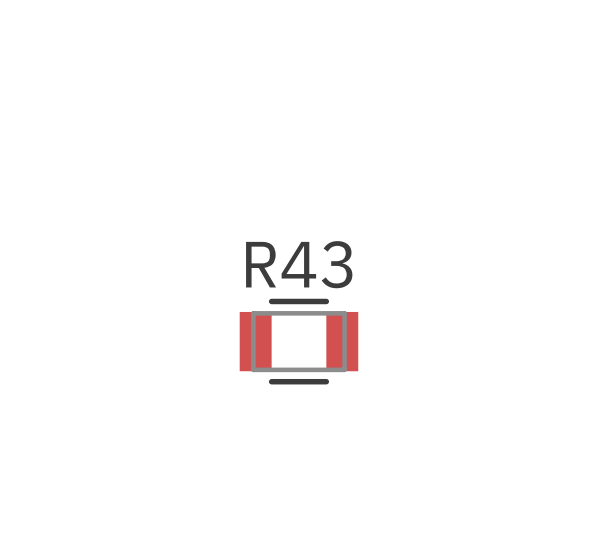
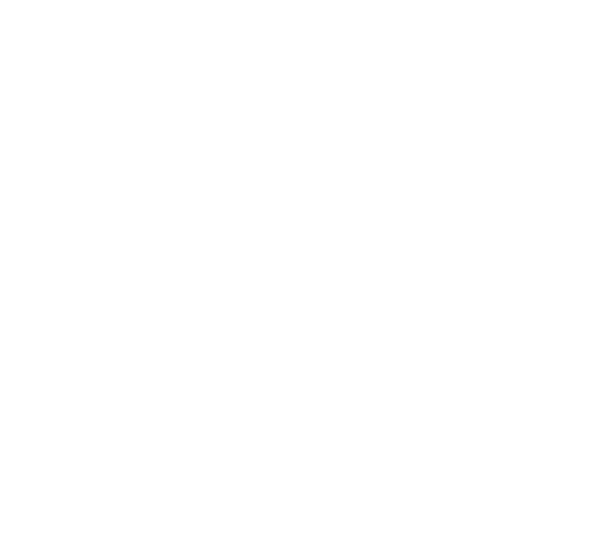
R43: (298, 341) -> none

